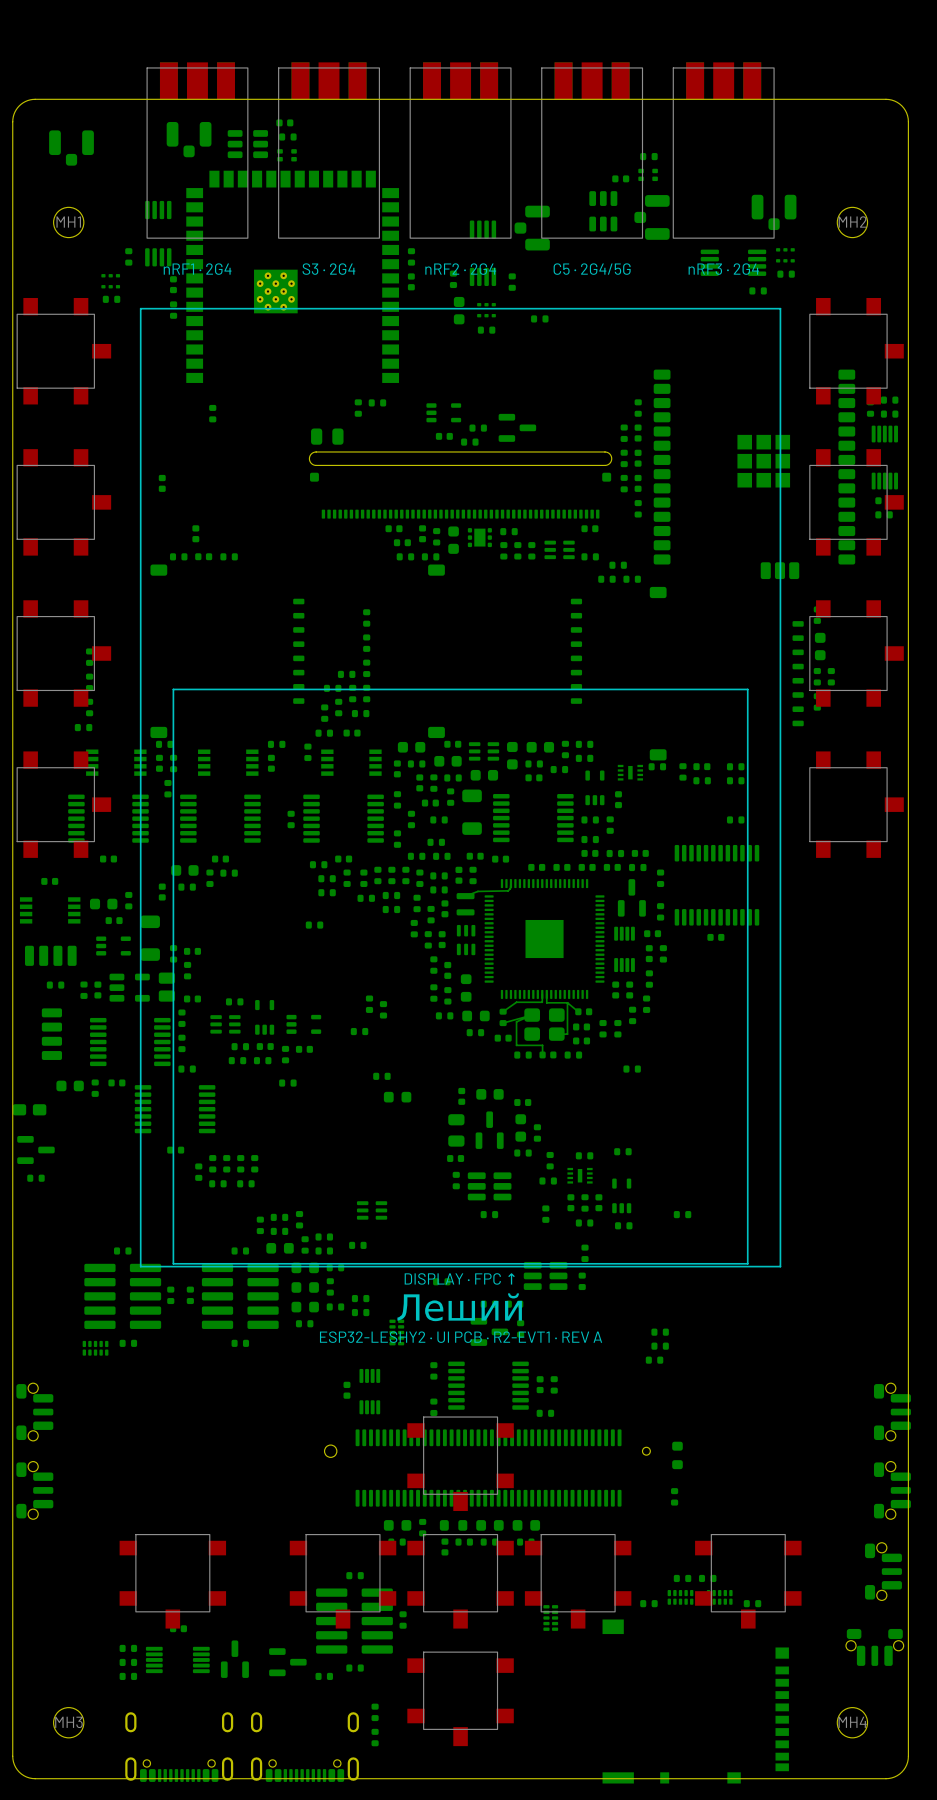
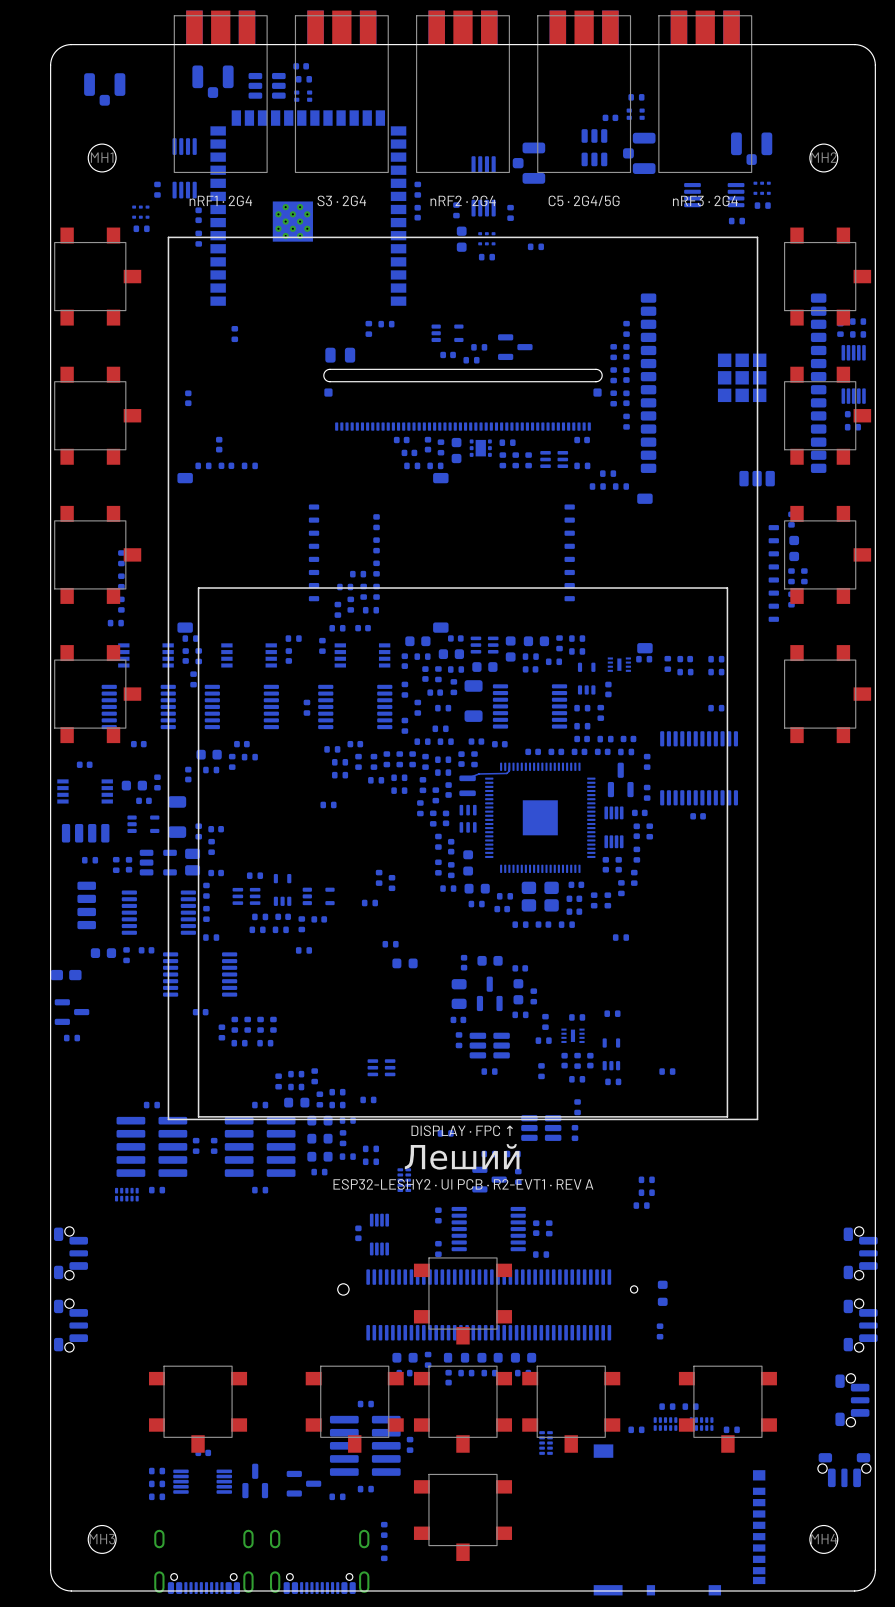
bottom track: (542, 994) (542, 1002) (516, 1002) (503, 1011) -> none
bottom track: (546, 994) (546, 1002) (567, 1002) -> none
bottom track: (567, 1002) (578, 1011) -> none
bottom track: (567, 1002) (567, 1034) (556, 1034) -> none
part rotation: 0° (503, 1017) -> 90° clockwise (504, 896)
bottom track: (503, 1023) (532, 1015) (516, 1021) (516, 1045) (542, 1045) (542, 1054) -> none

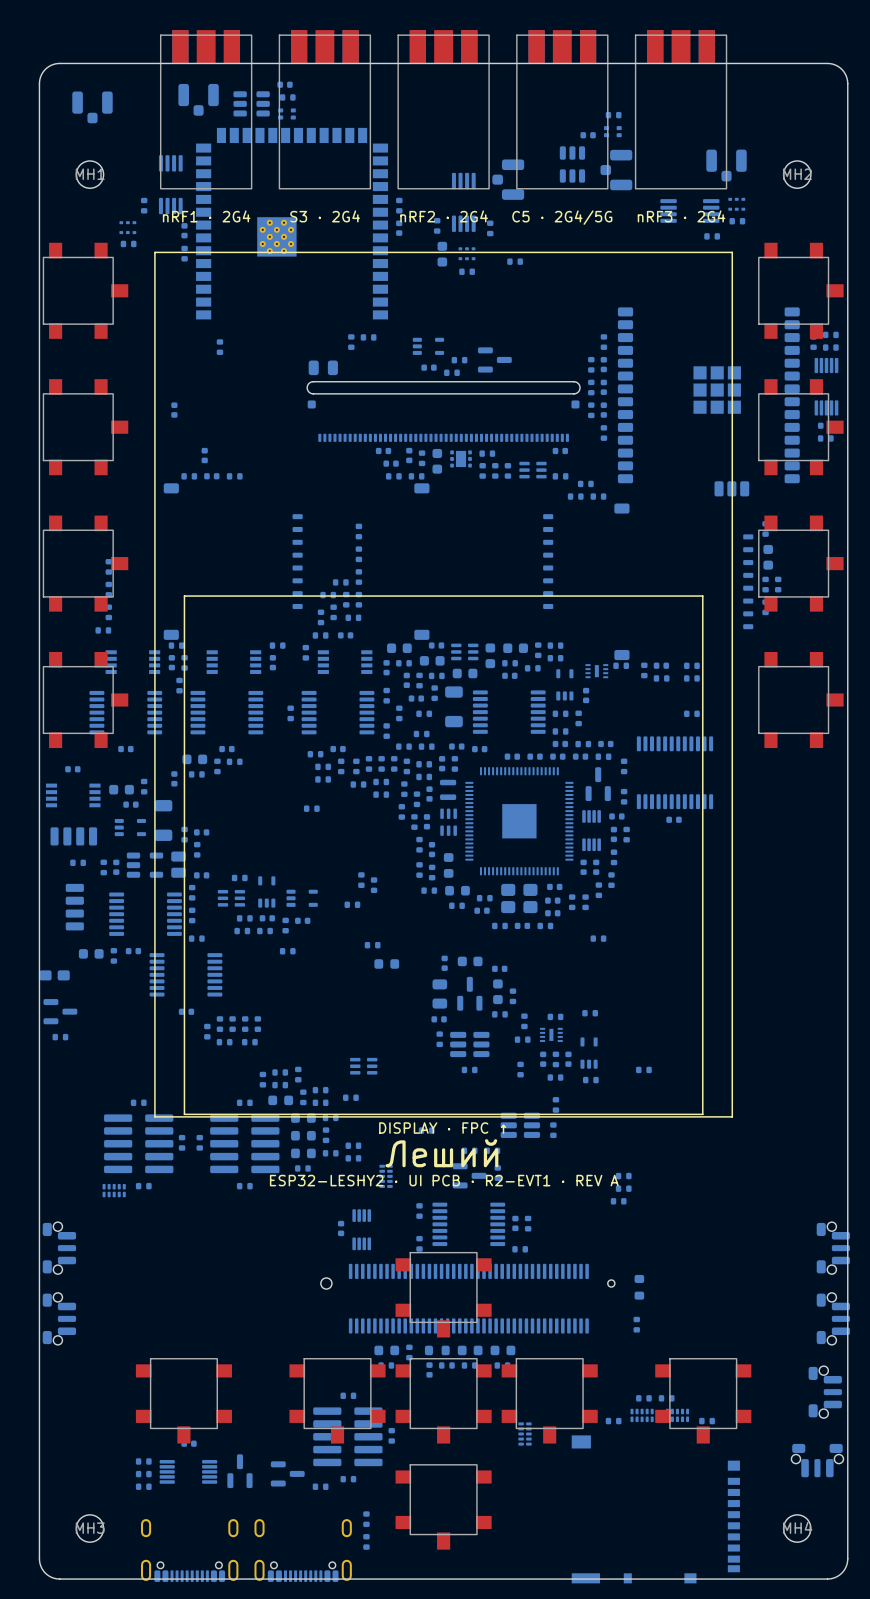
bottom track: (509, 766) (506, 773) (478, 773) (467, 778) -> none

